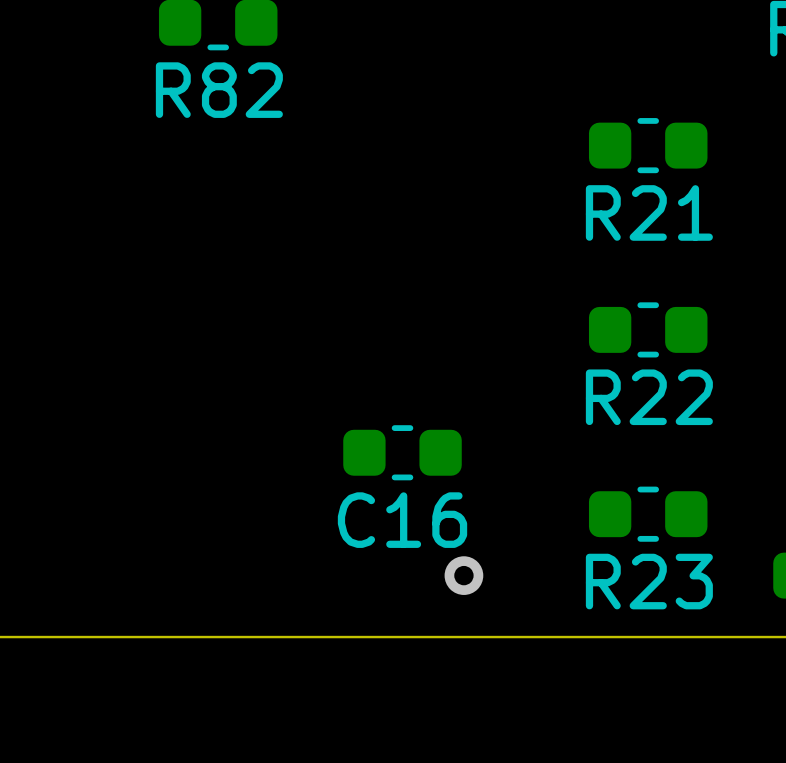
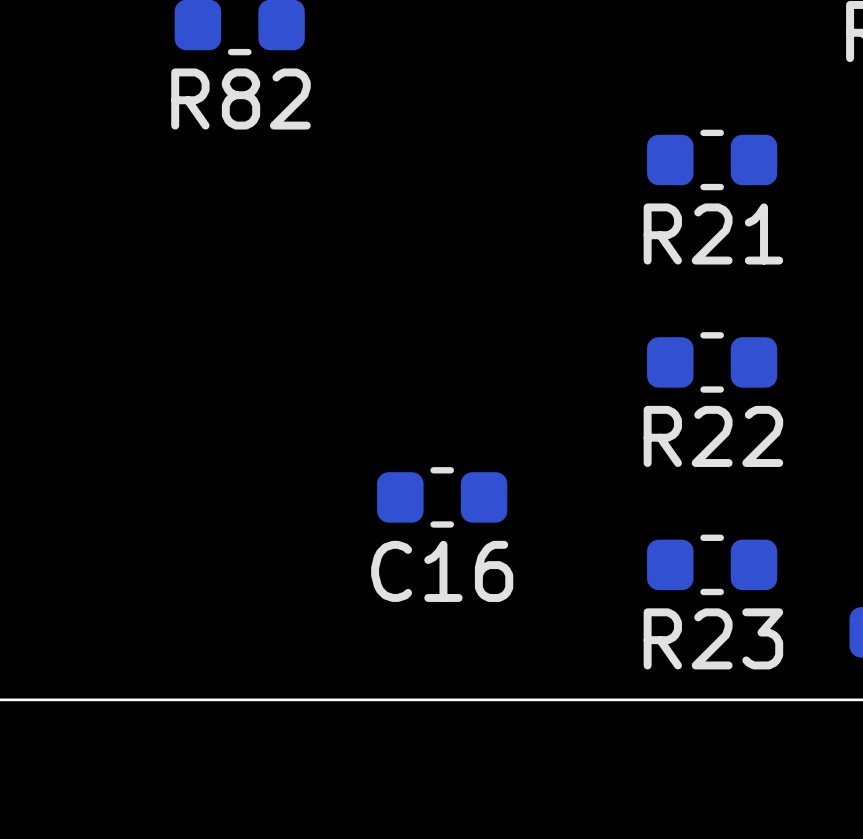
via: (463, 575) -> none

